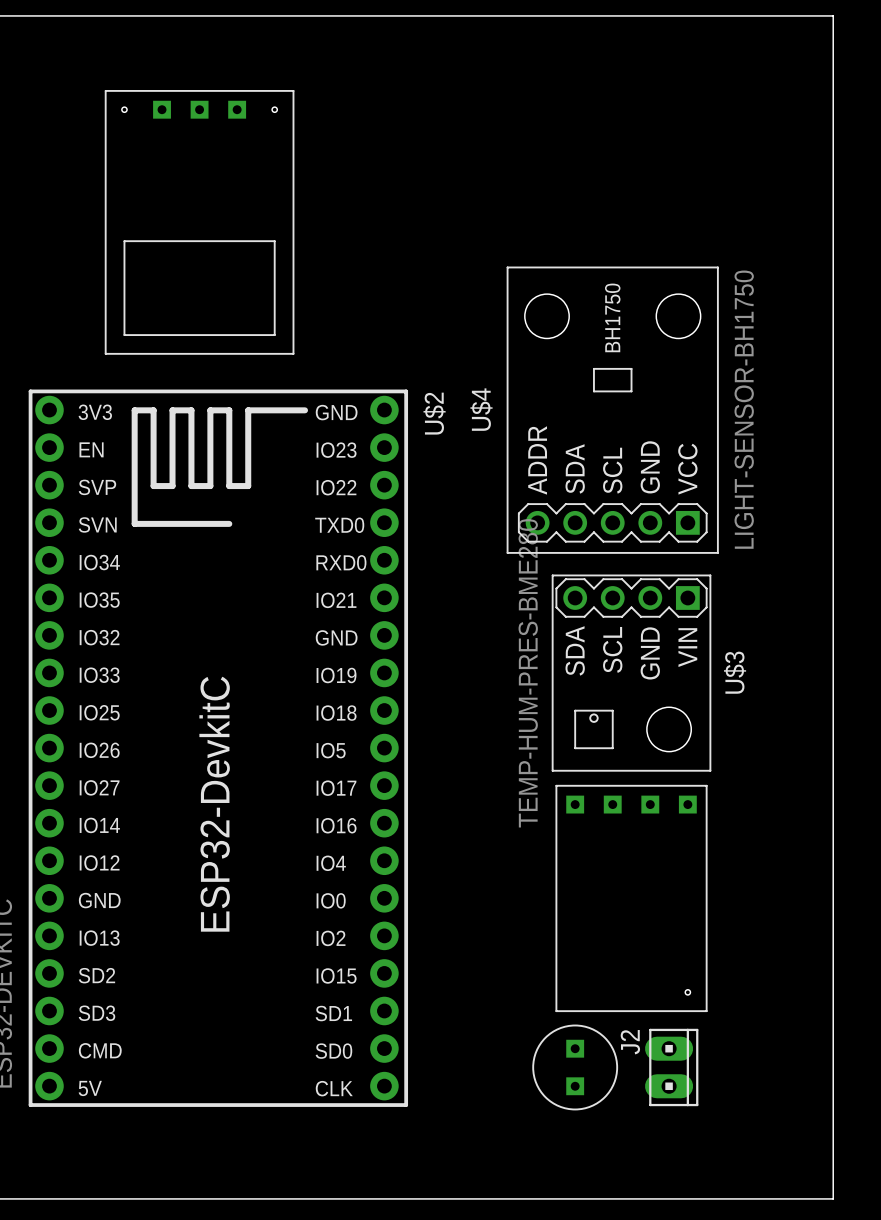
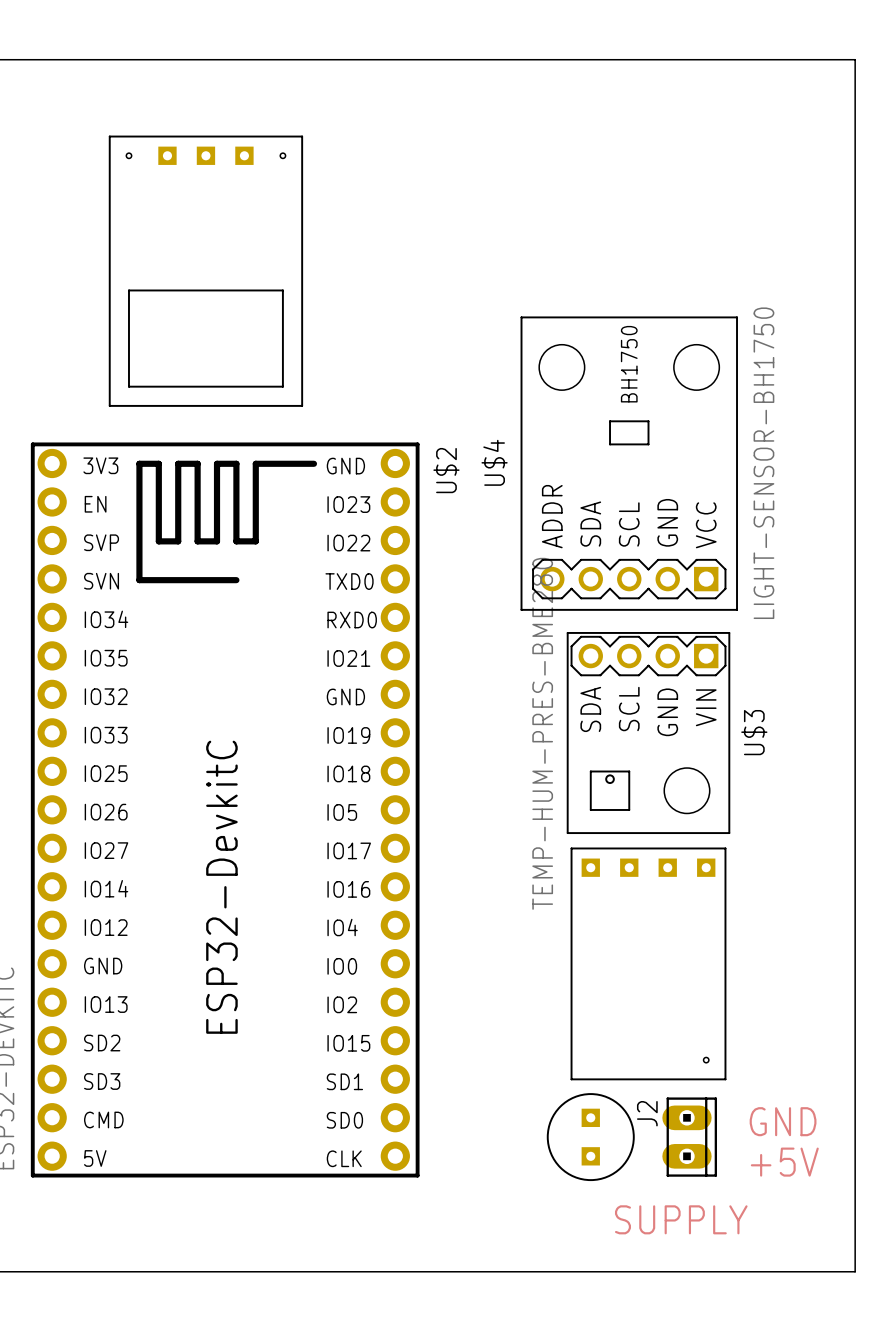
text: none -> GND (783, 1121)
text: none -> +5V (784, 1162)
text: none -> SUPPLY (681, 1219)

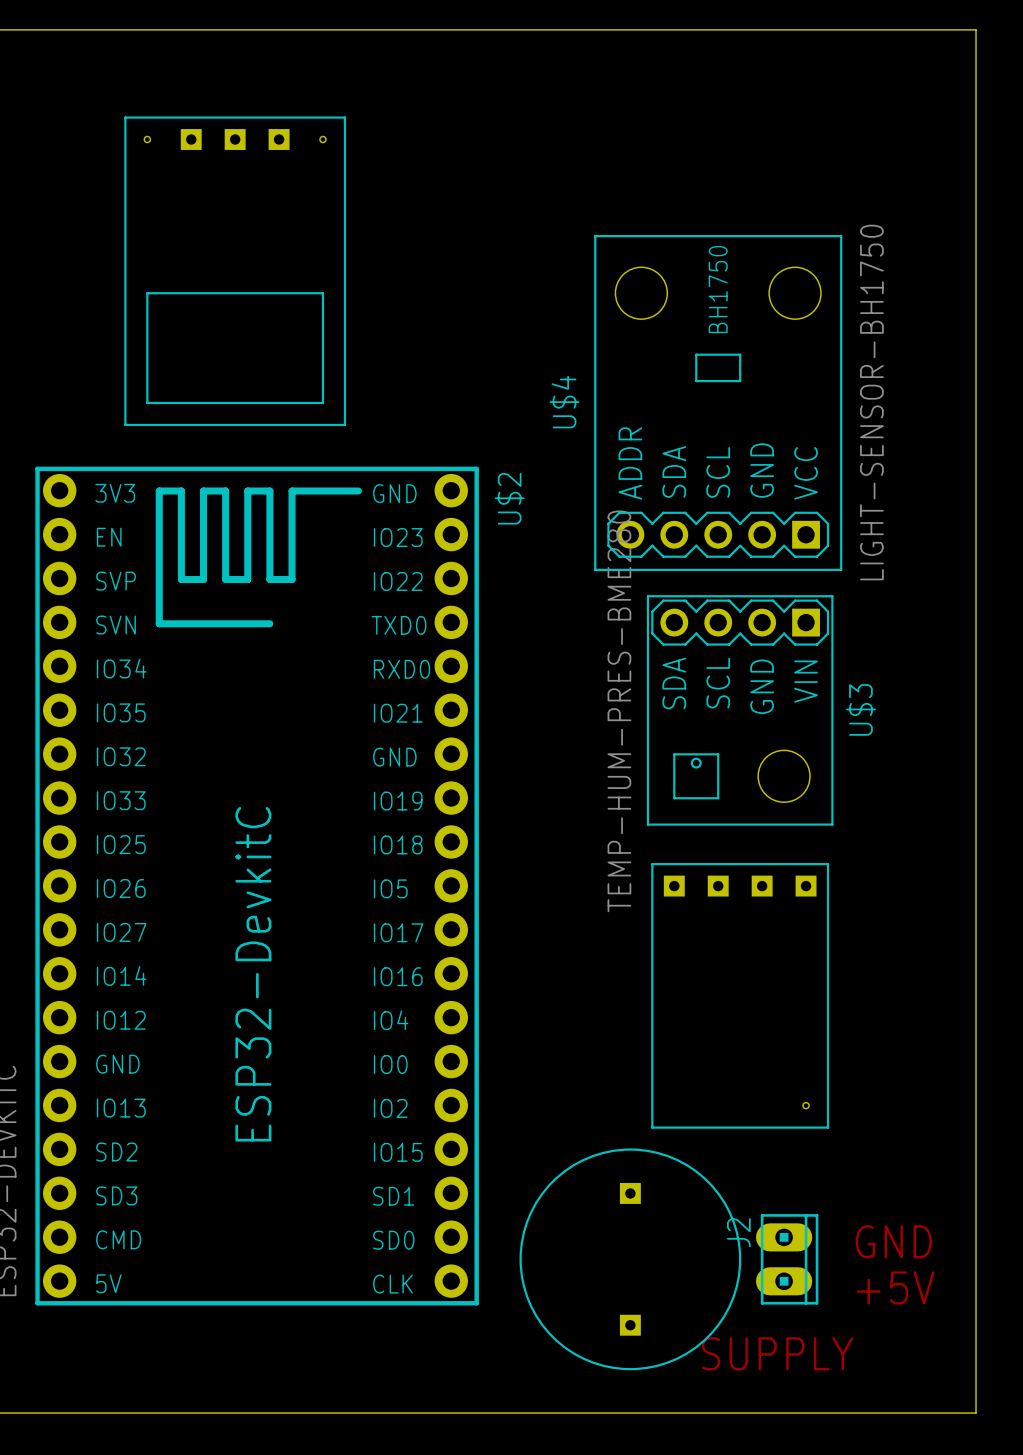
U$4 position: (629, 463) -> (718, 403)
U$3 position: (648, 733) -> (740, 710)
part position: (648, 963) -> (740, 995)
part: none -> (630, 1259)
part: (590, 1137) -> none

